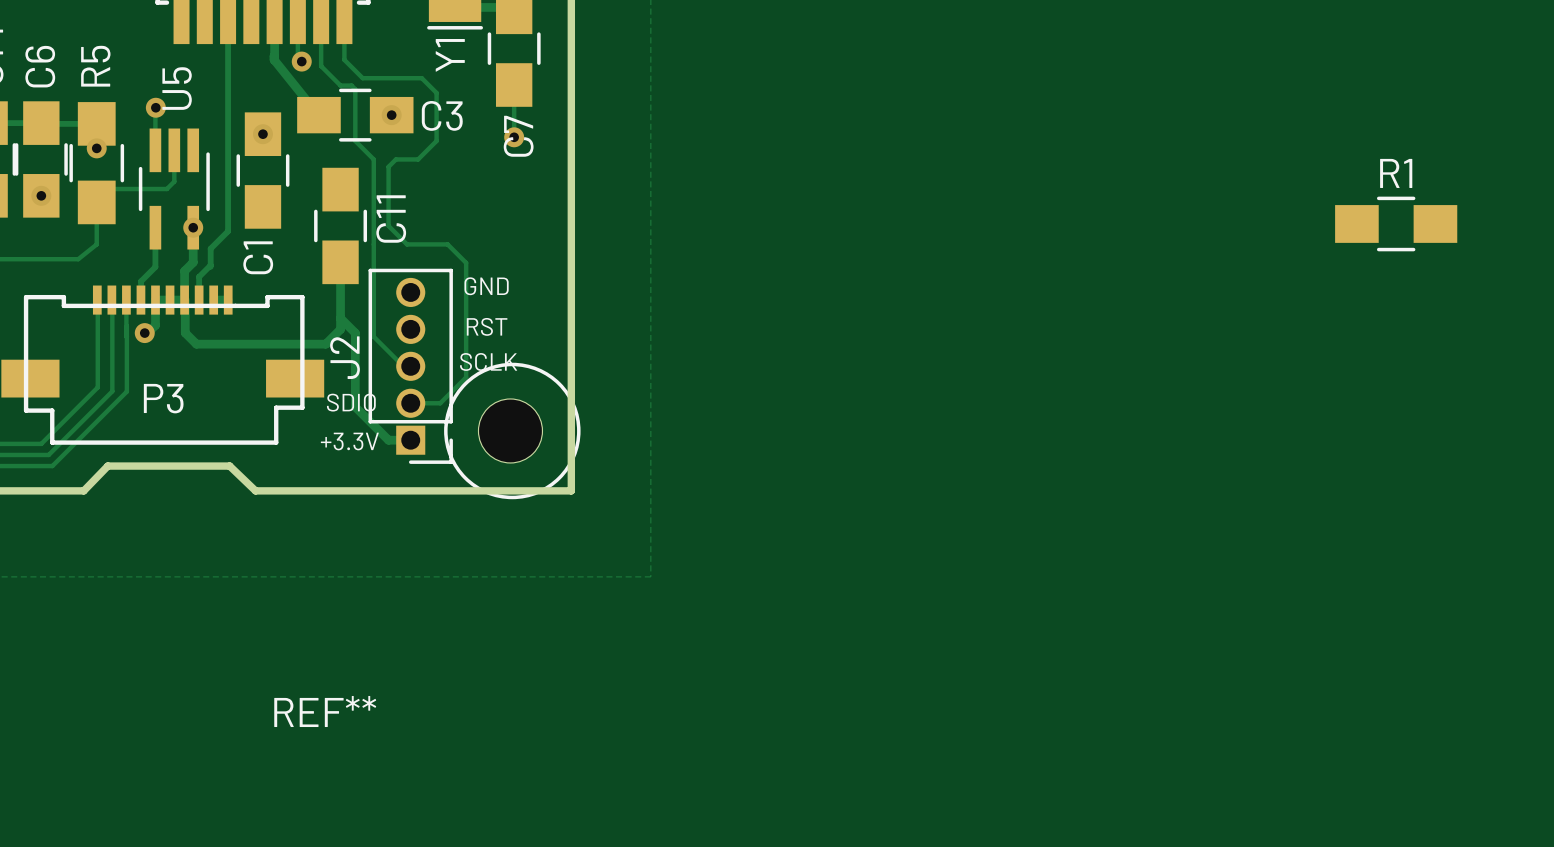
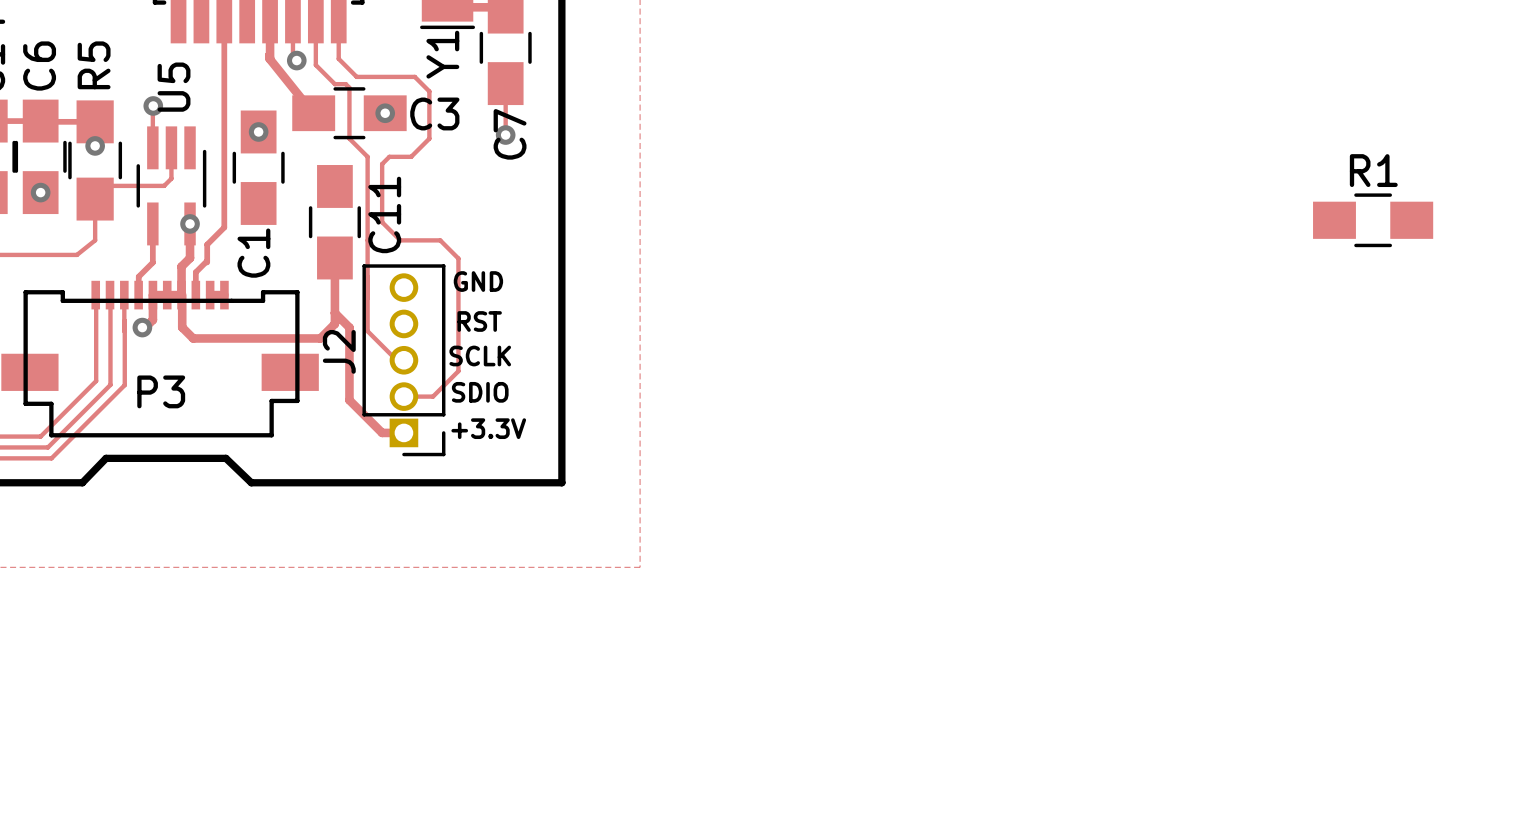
text position: SDIO (351, 402) -> SDIO (480, 392)
REF**: (512, 430) -> none
text position: +3.3V (349, 441) -> +3.3V (488, 428)

